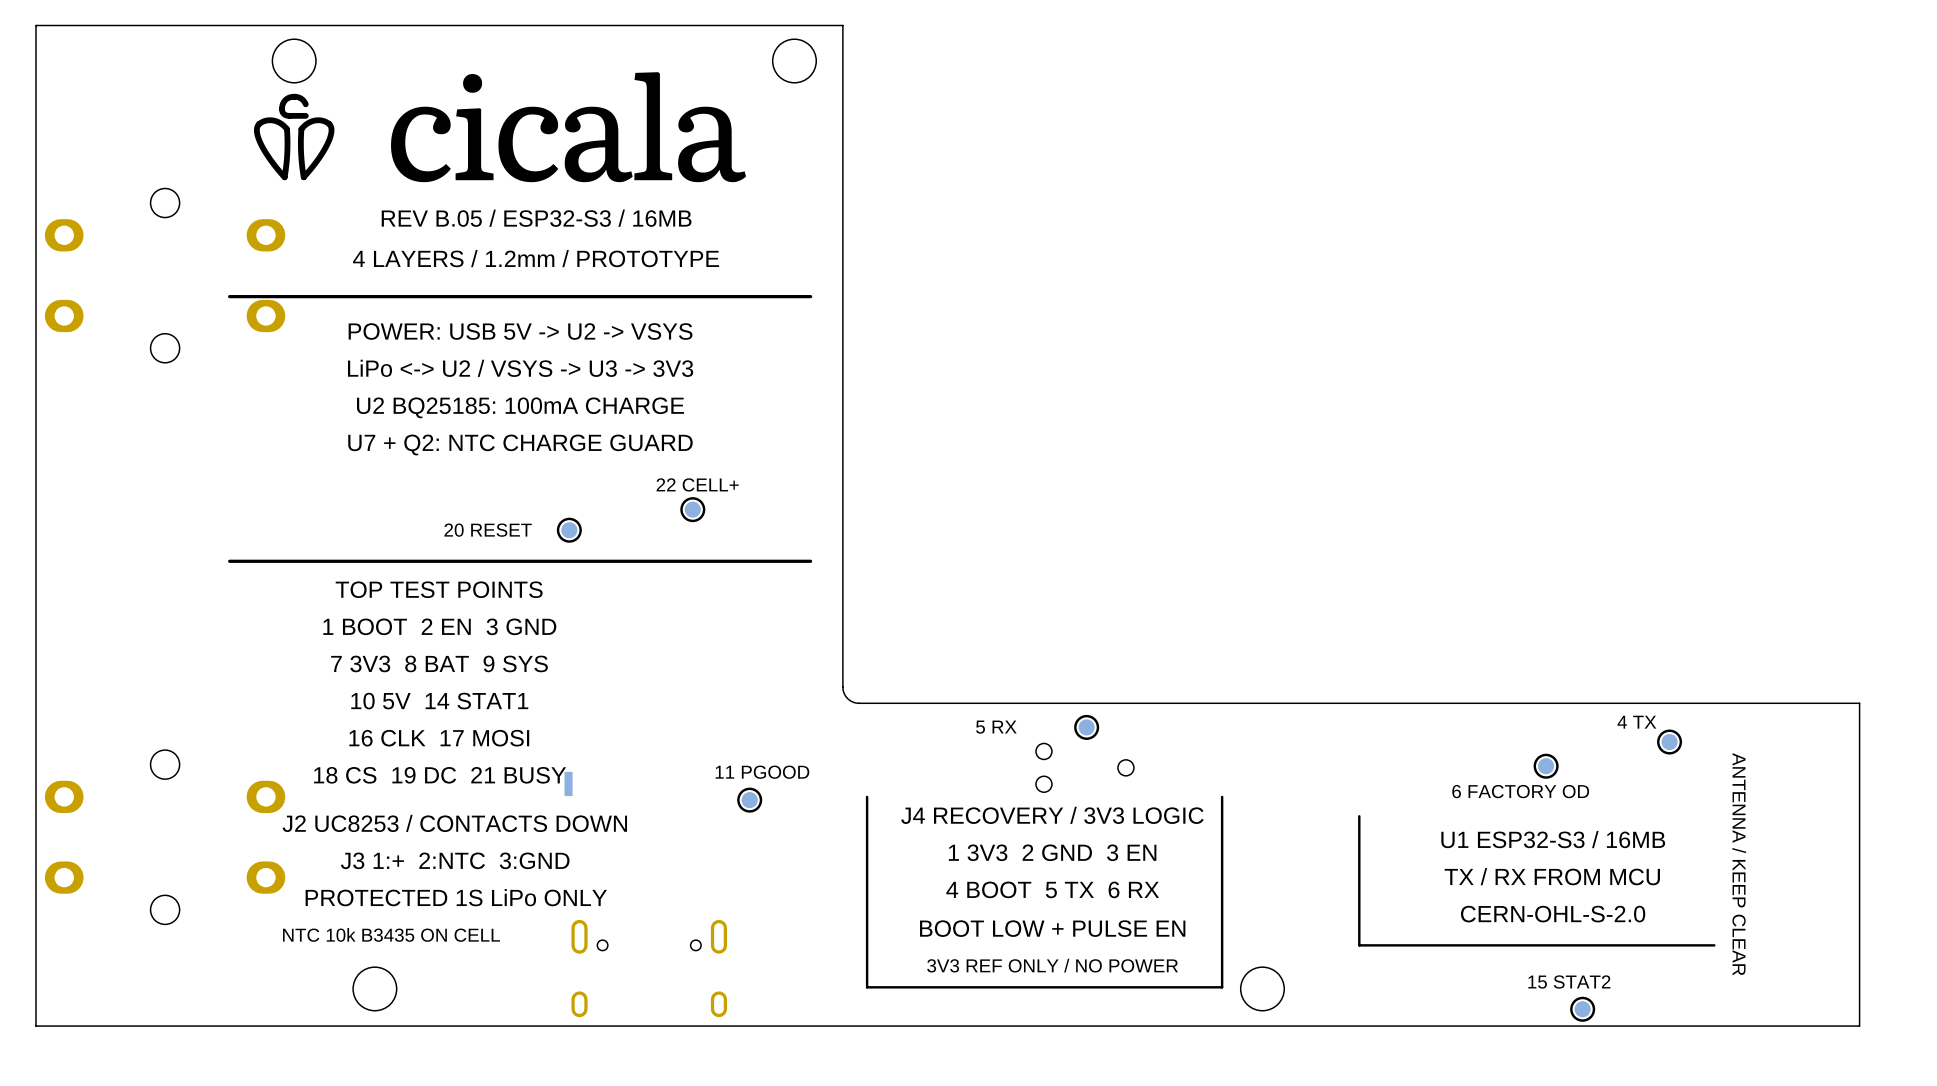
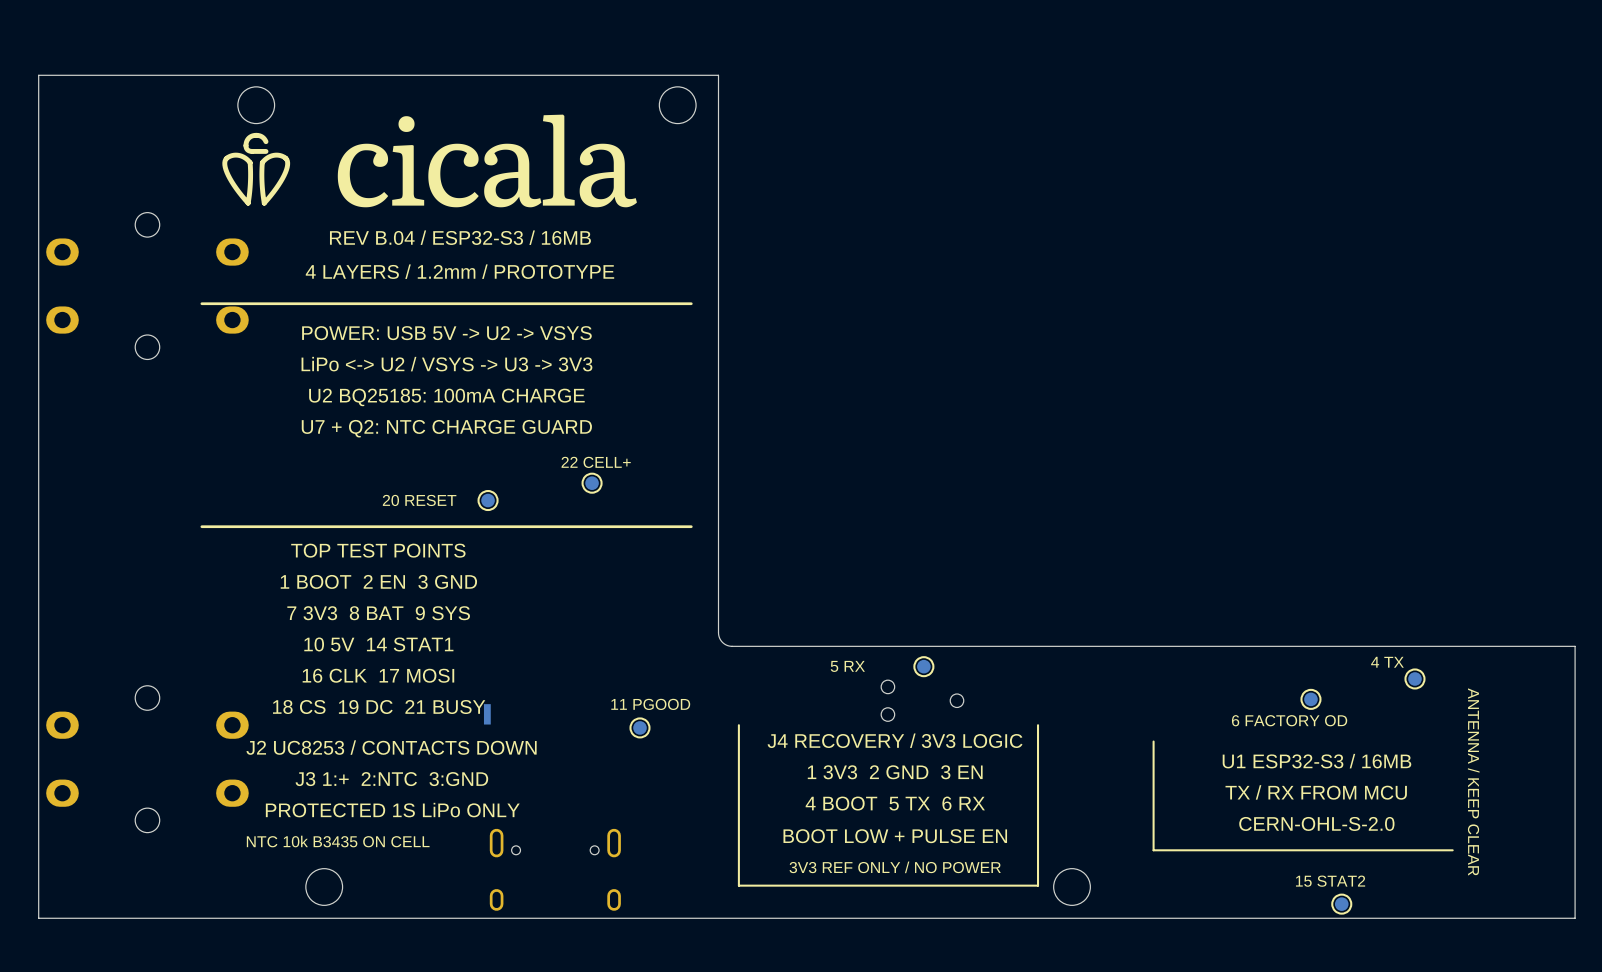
text: REV B.05 / ESP32-S3 / 16MB (536, 218) -> REV B.04 / ESP32-S3 / 16MB (460, 237)

